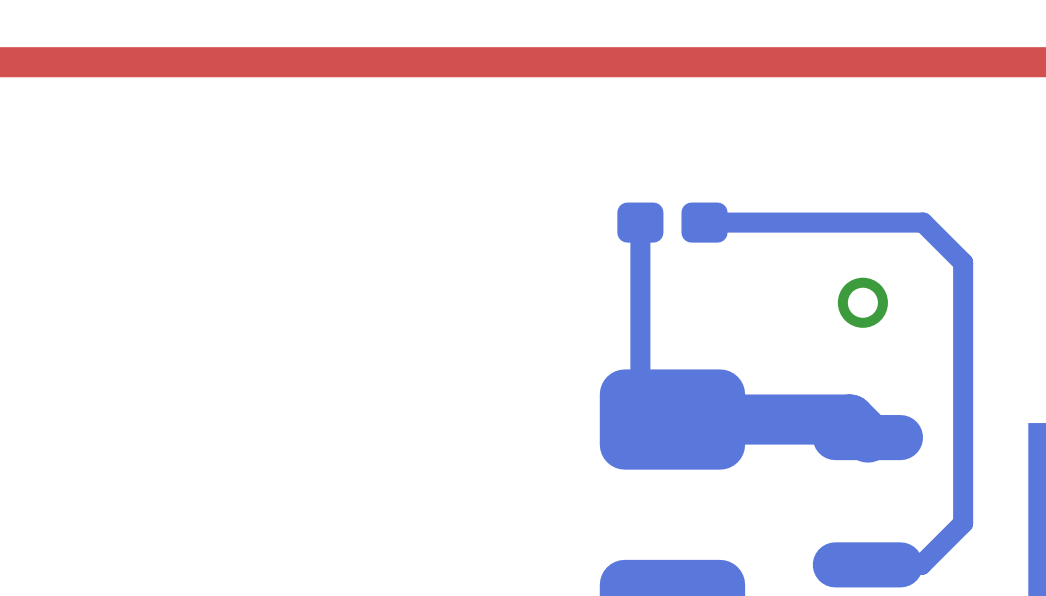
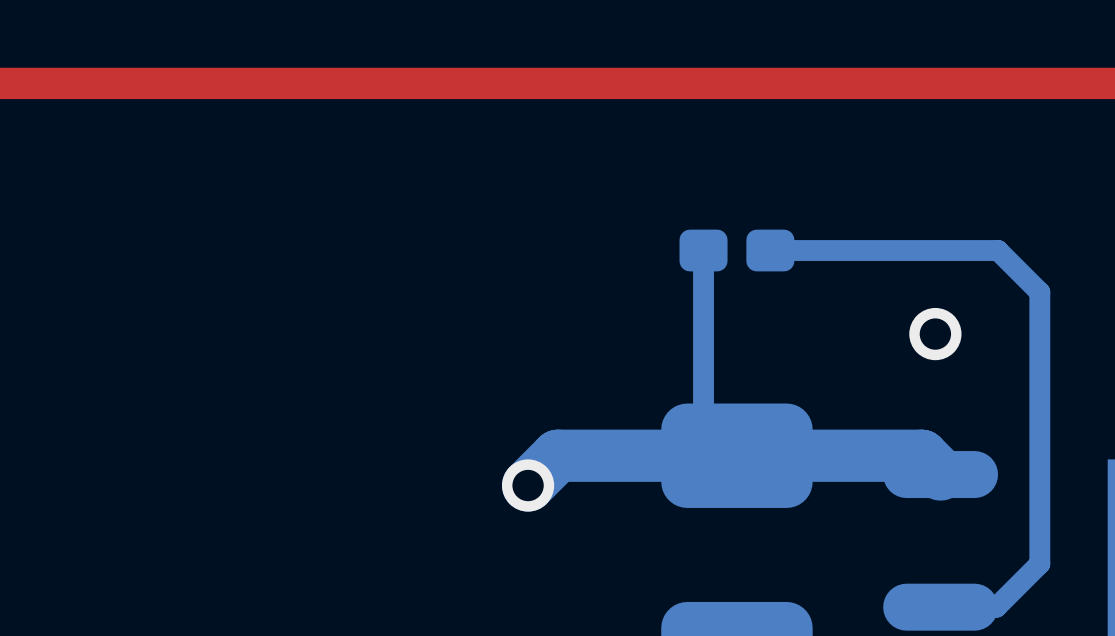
bottom track: none -> (736, 455) (557, 455) (528, 485)
via: none -> (528, 485)

